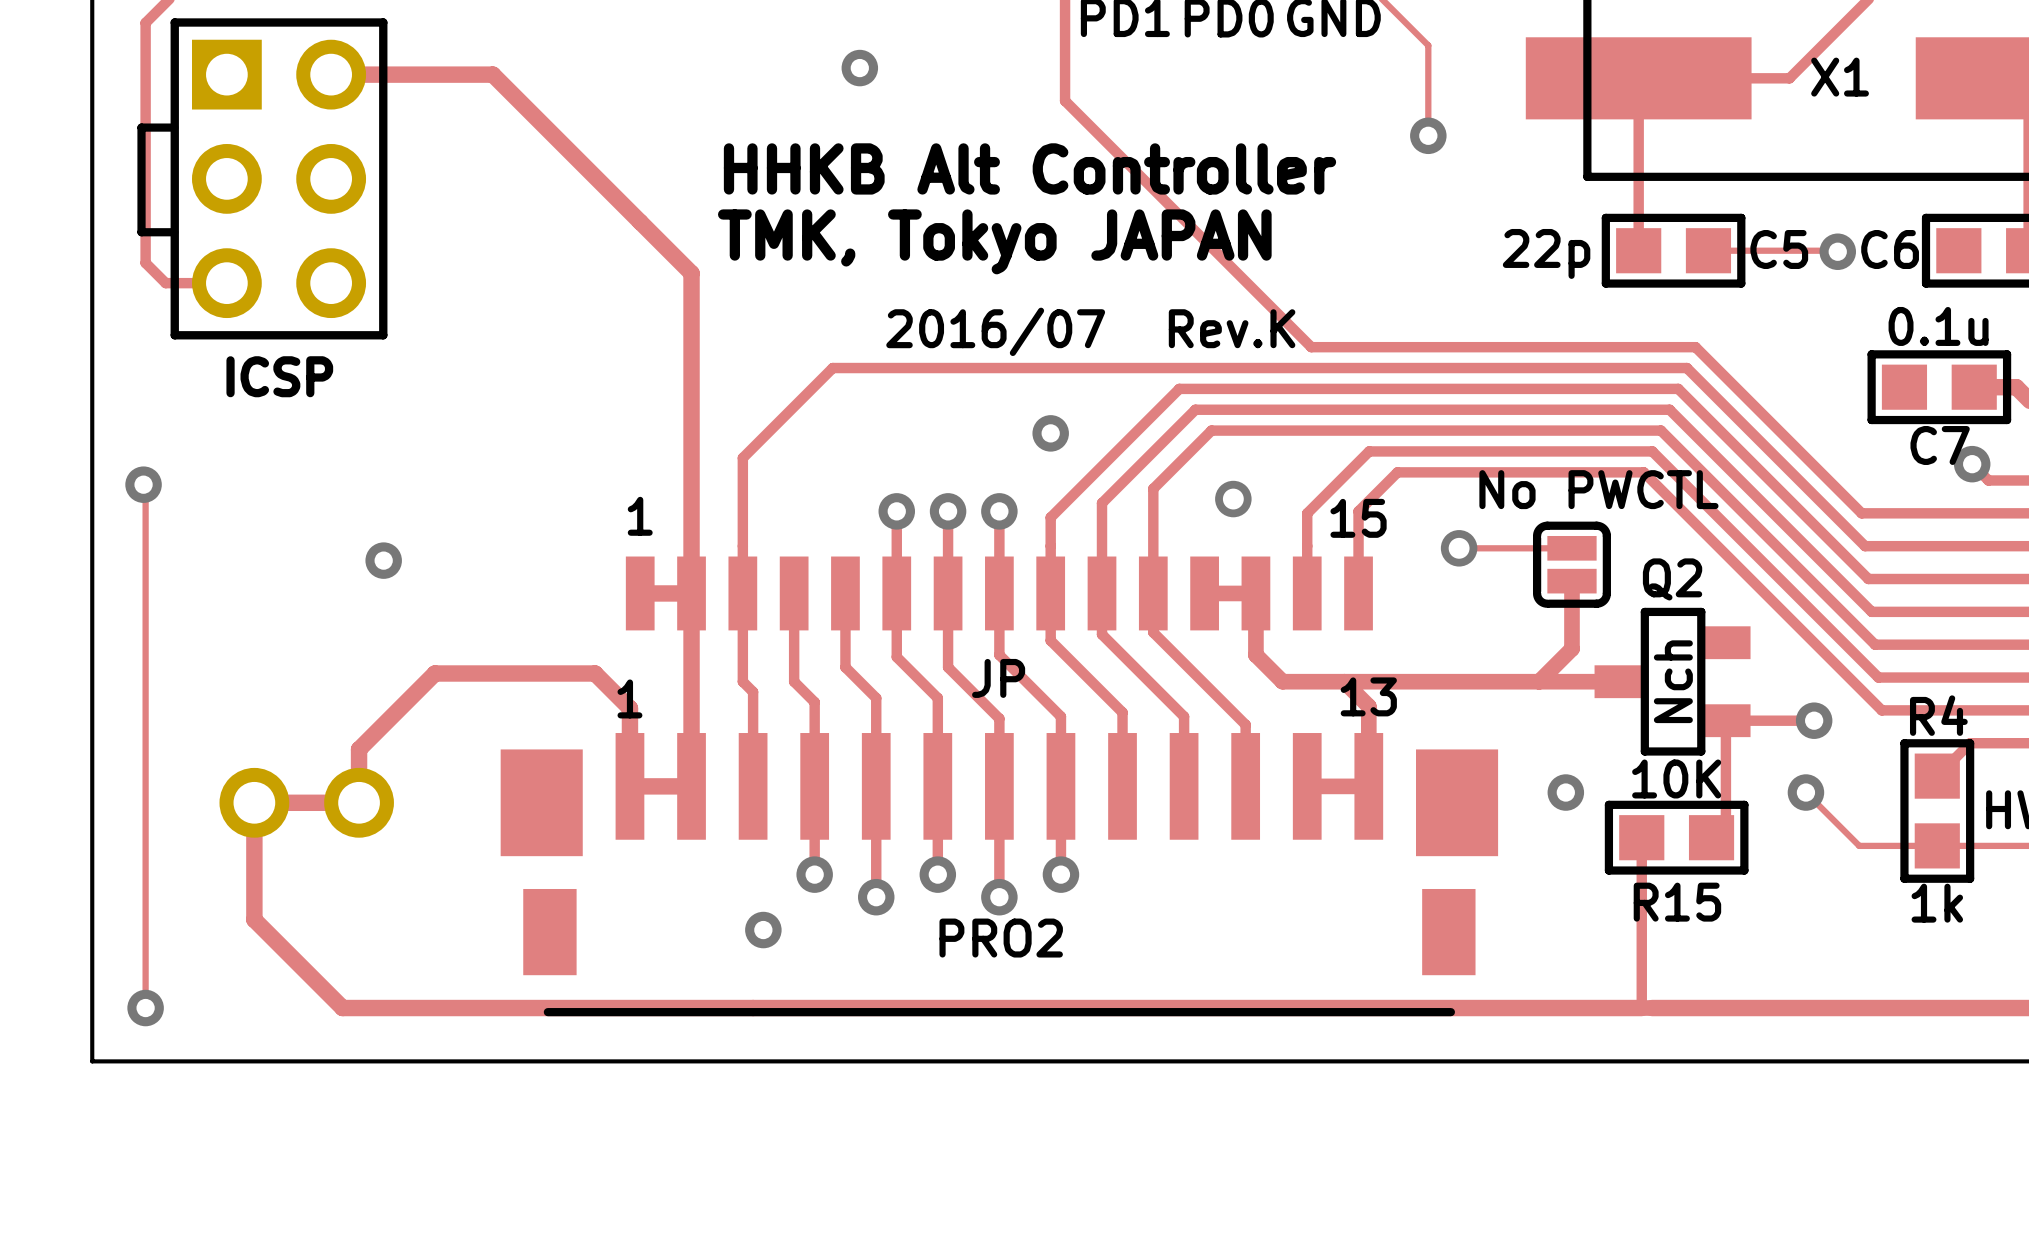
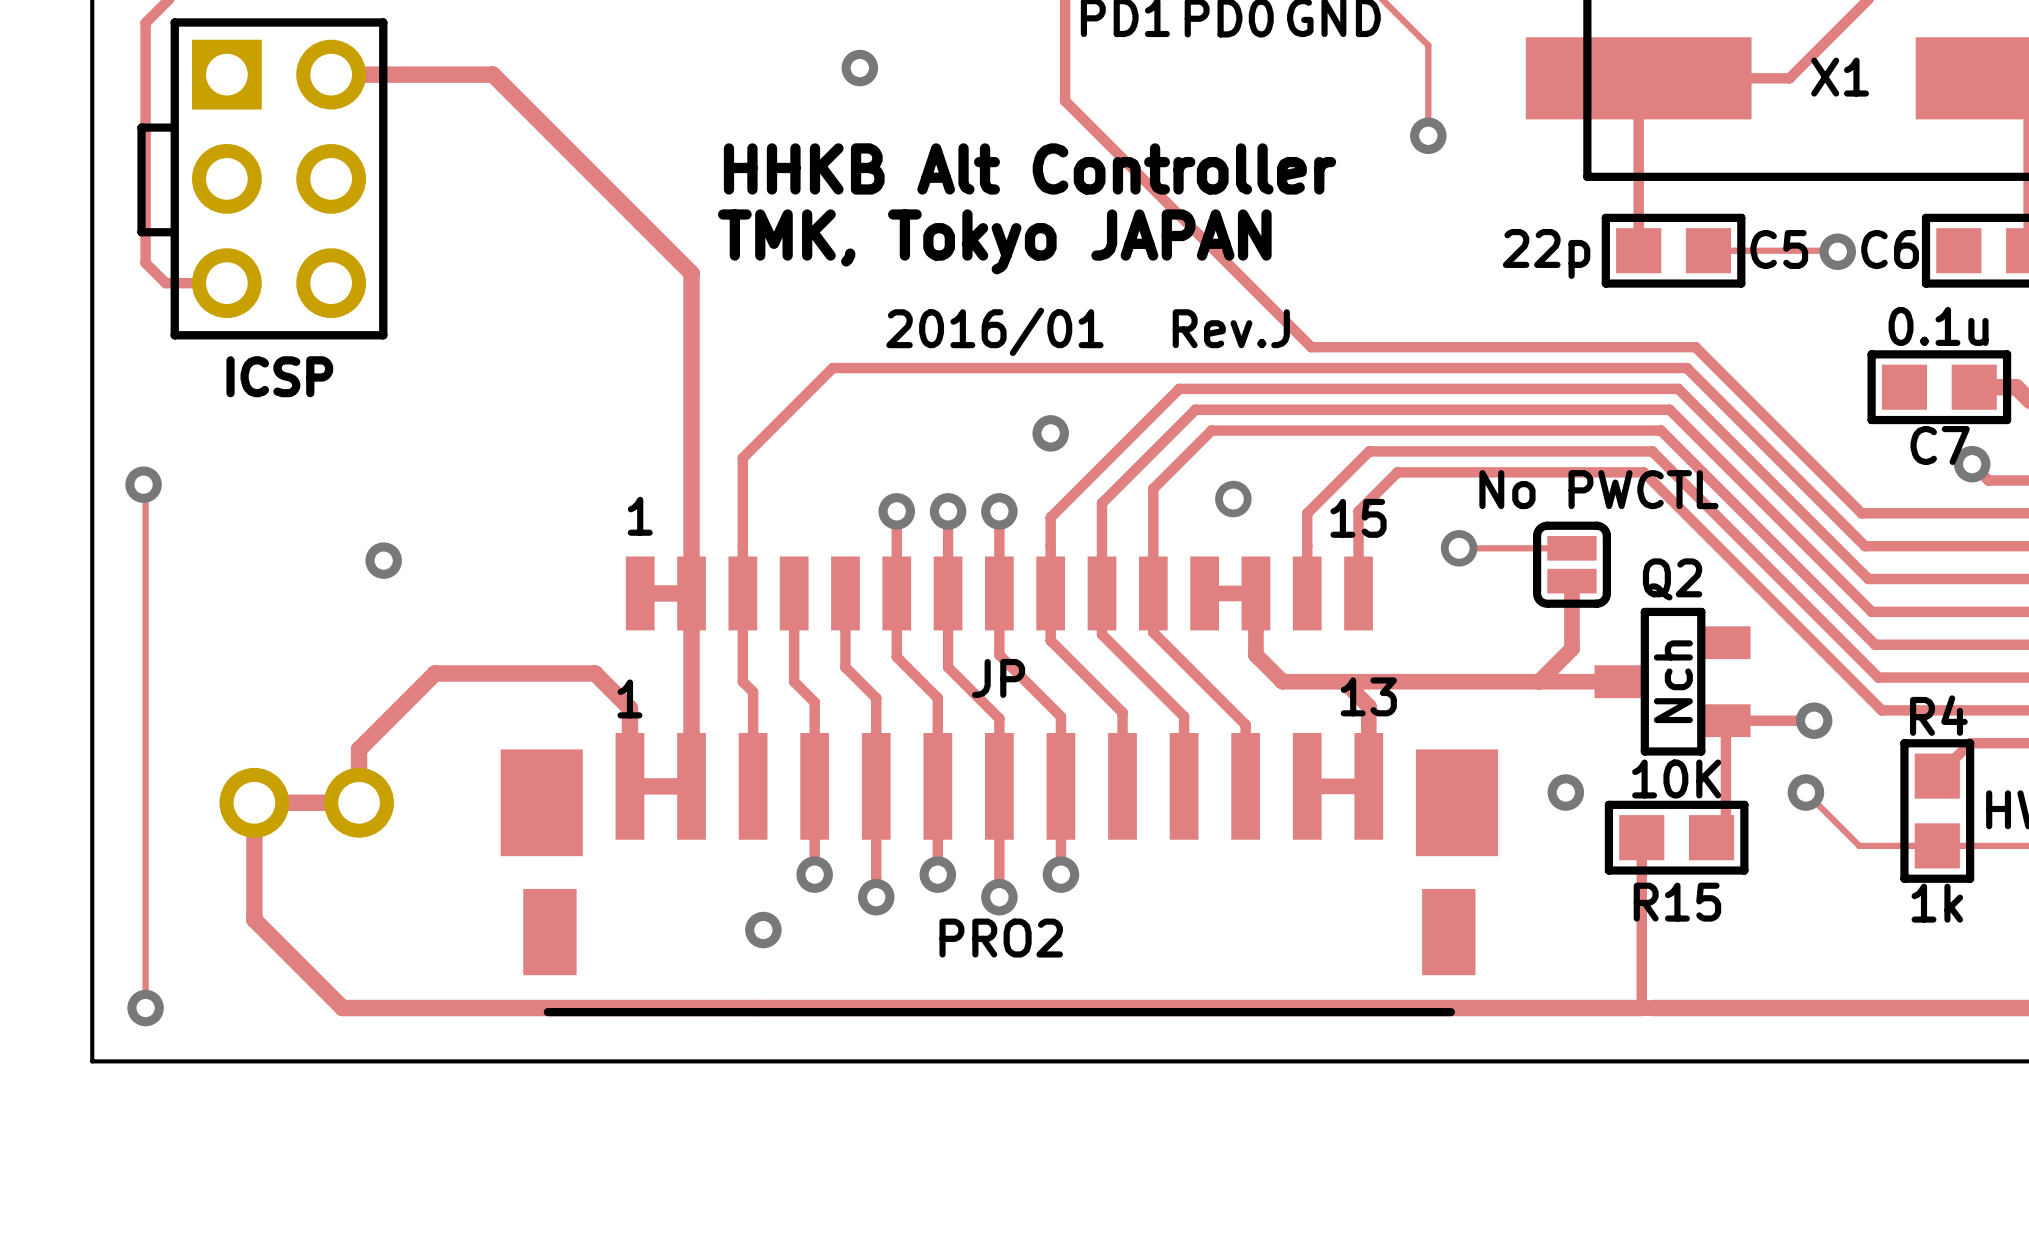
text: Rev.K (1232, 328) -> Rev.J (1231, 328)
text: 2016/07 (995, 331) -> 2016/01 (994, 331)

